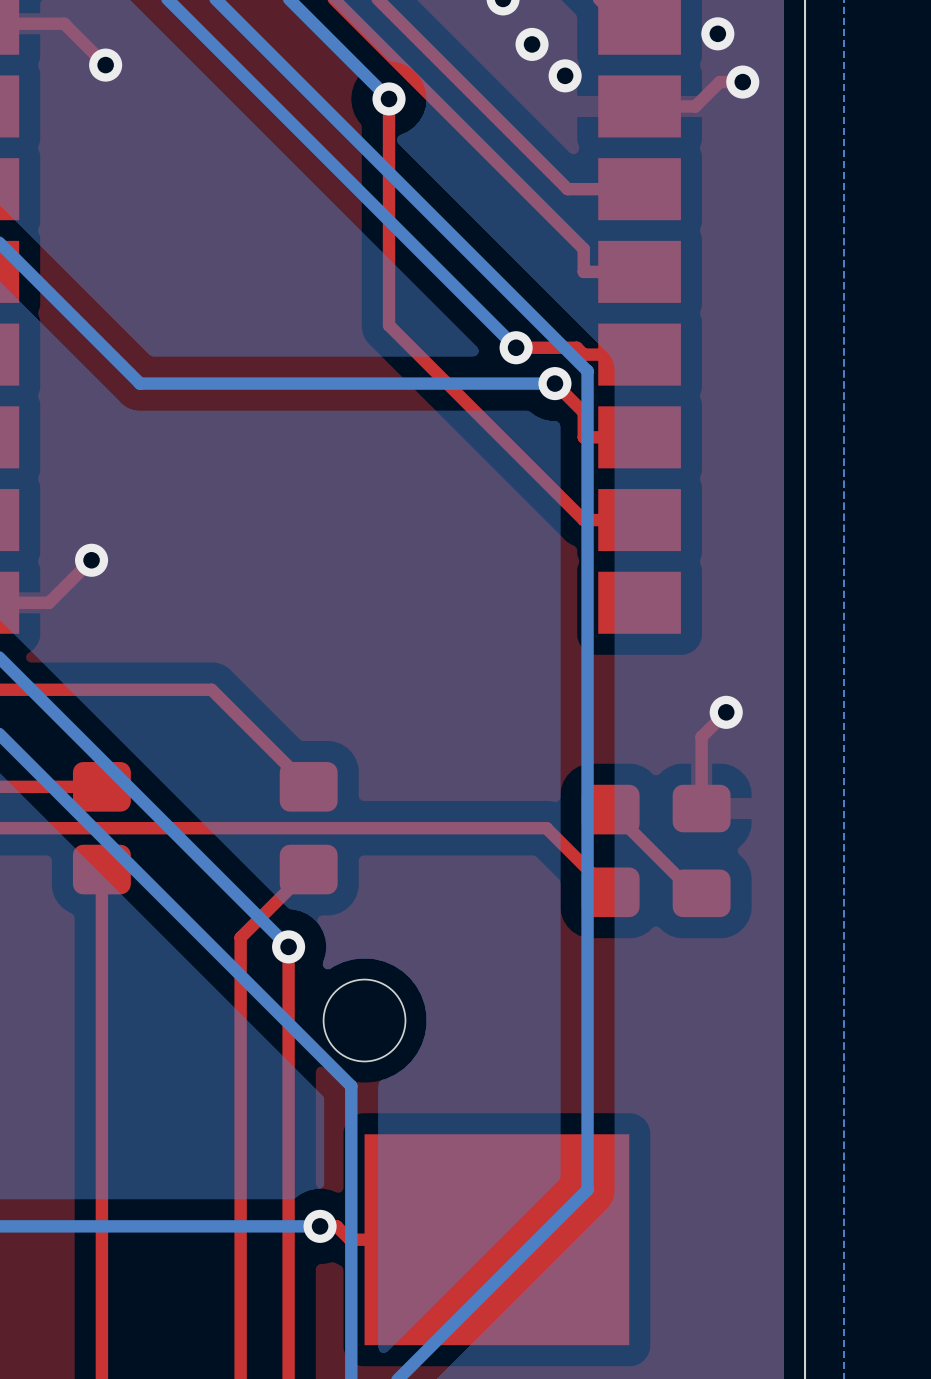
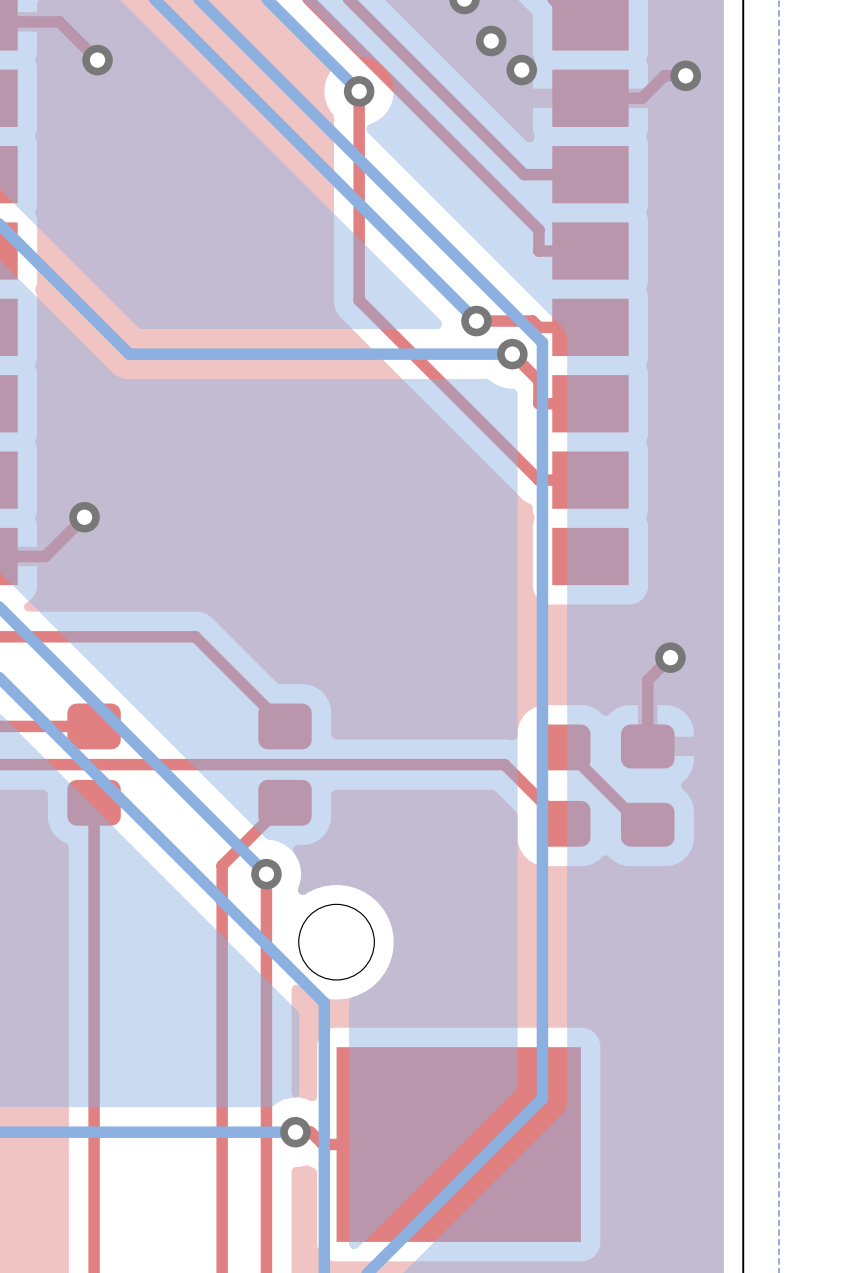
via: (717, 33) -> none

